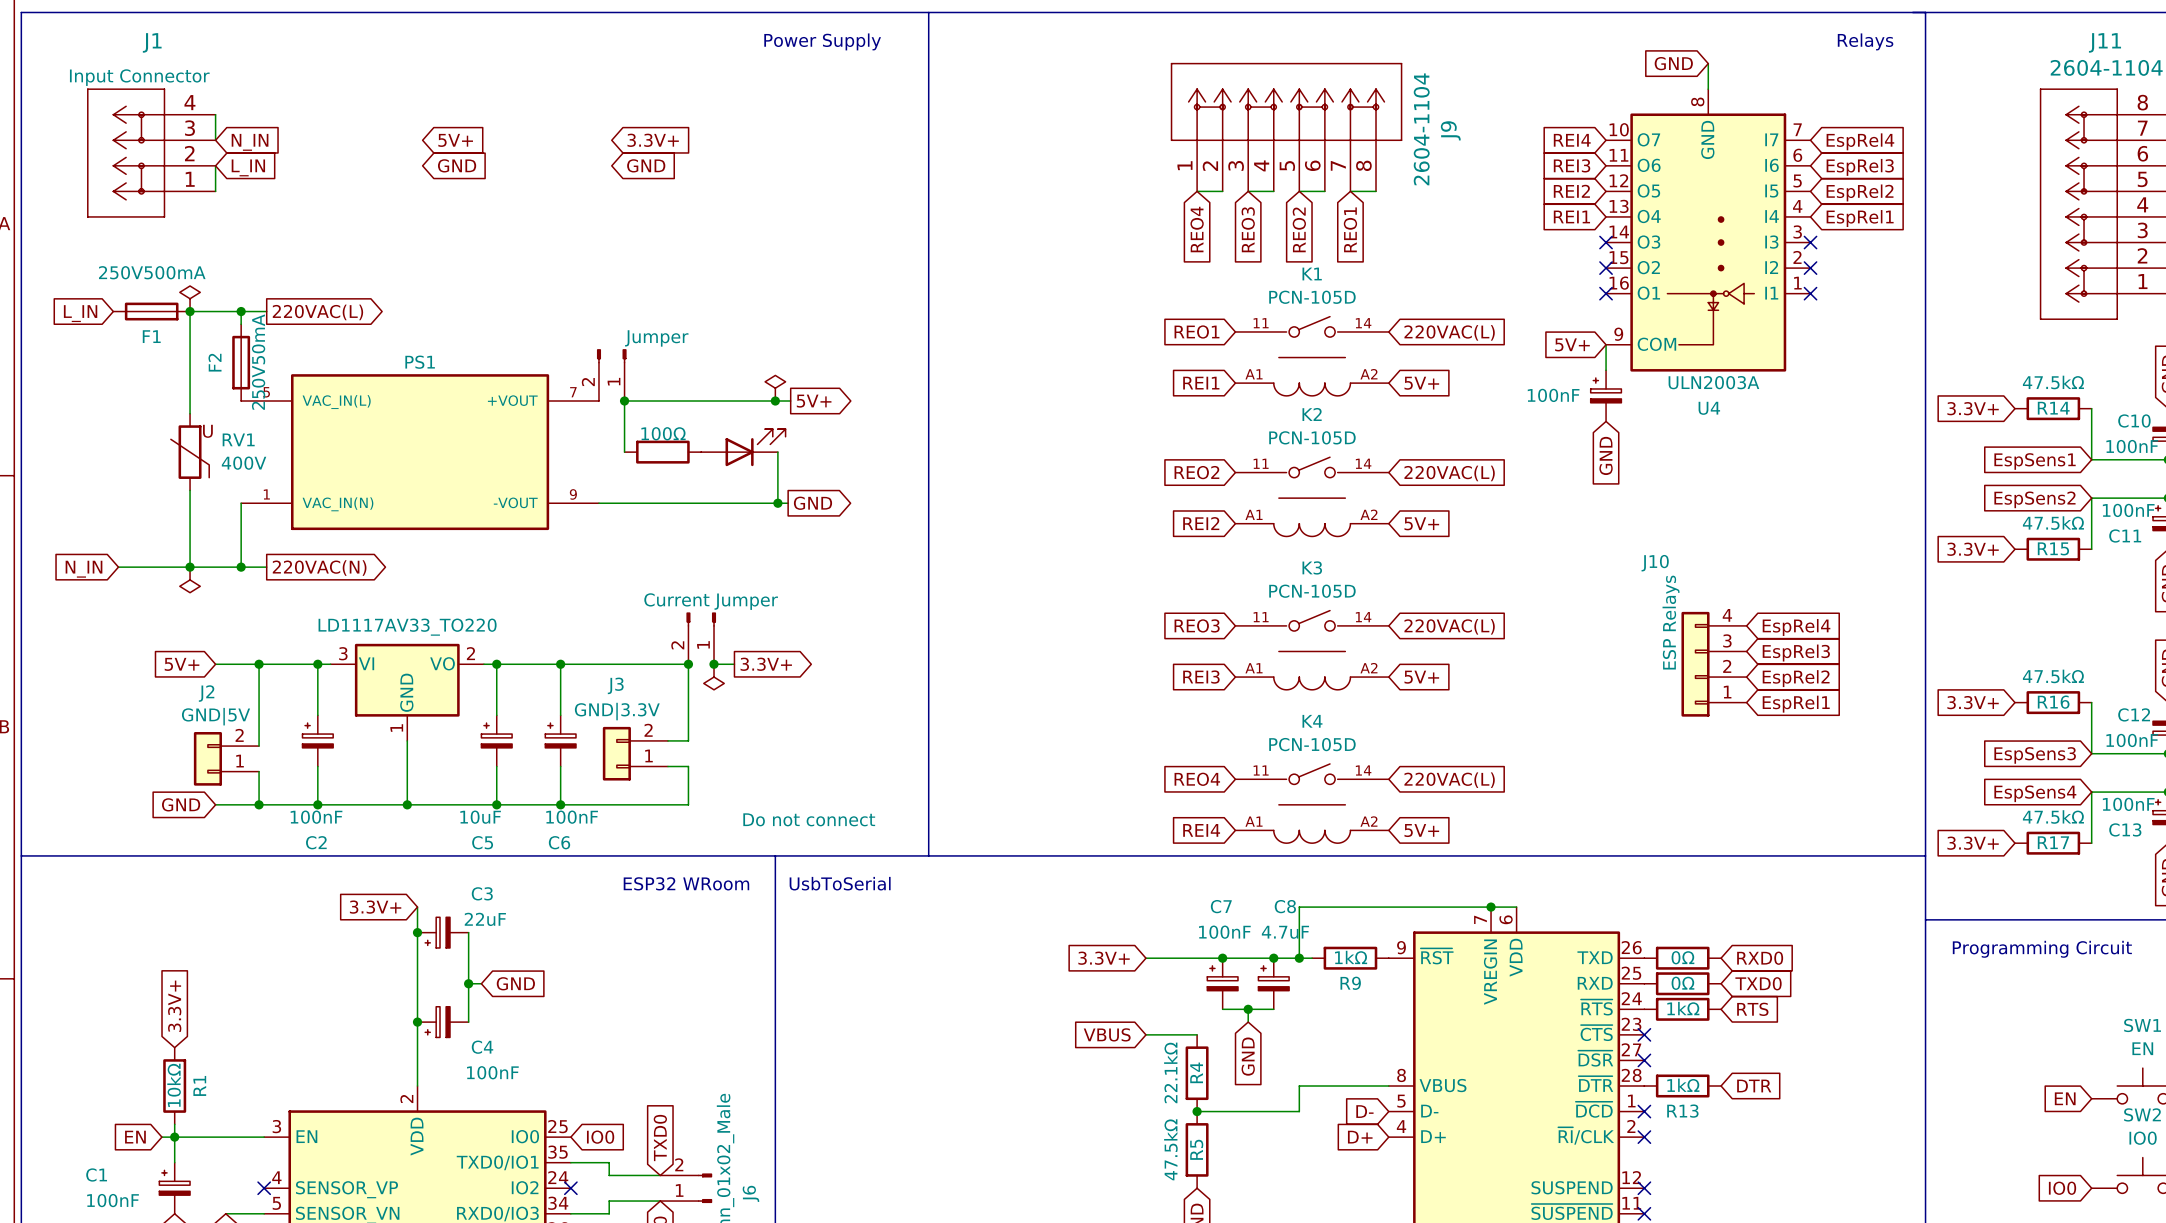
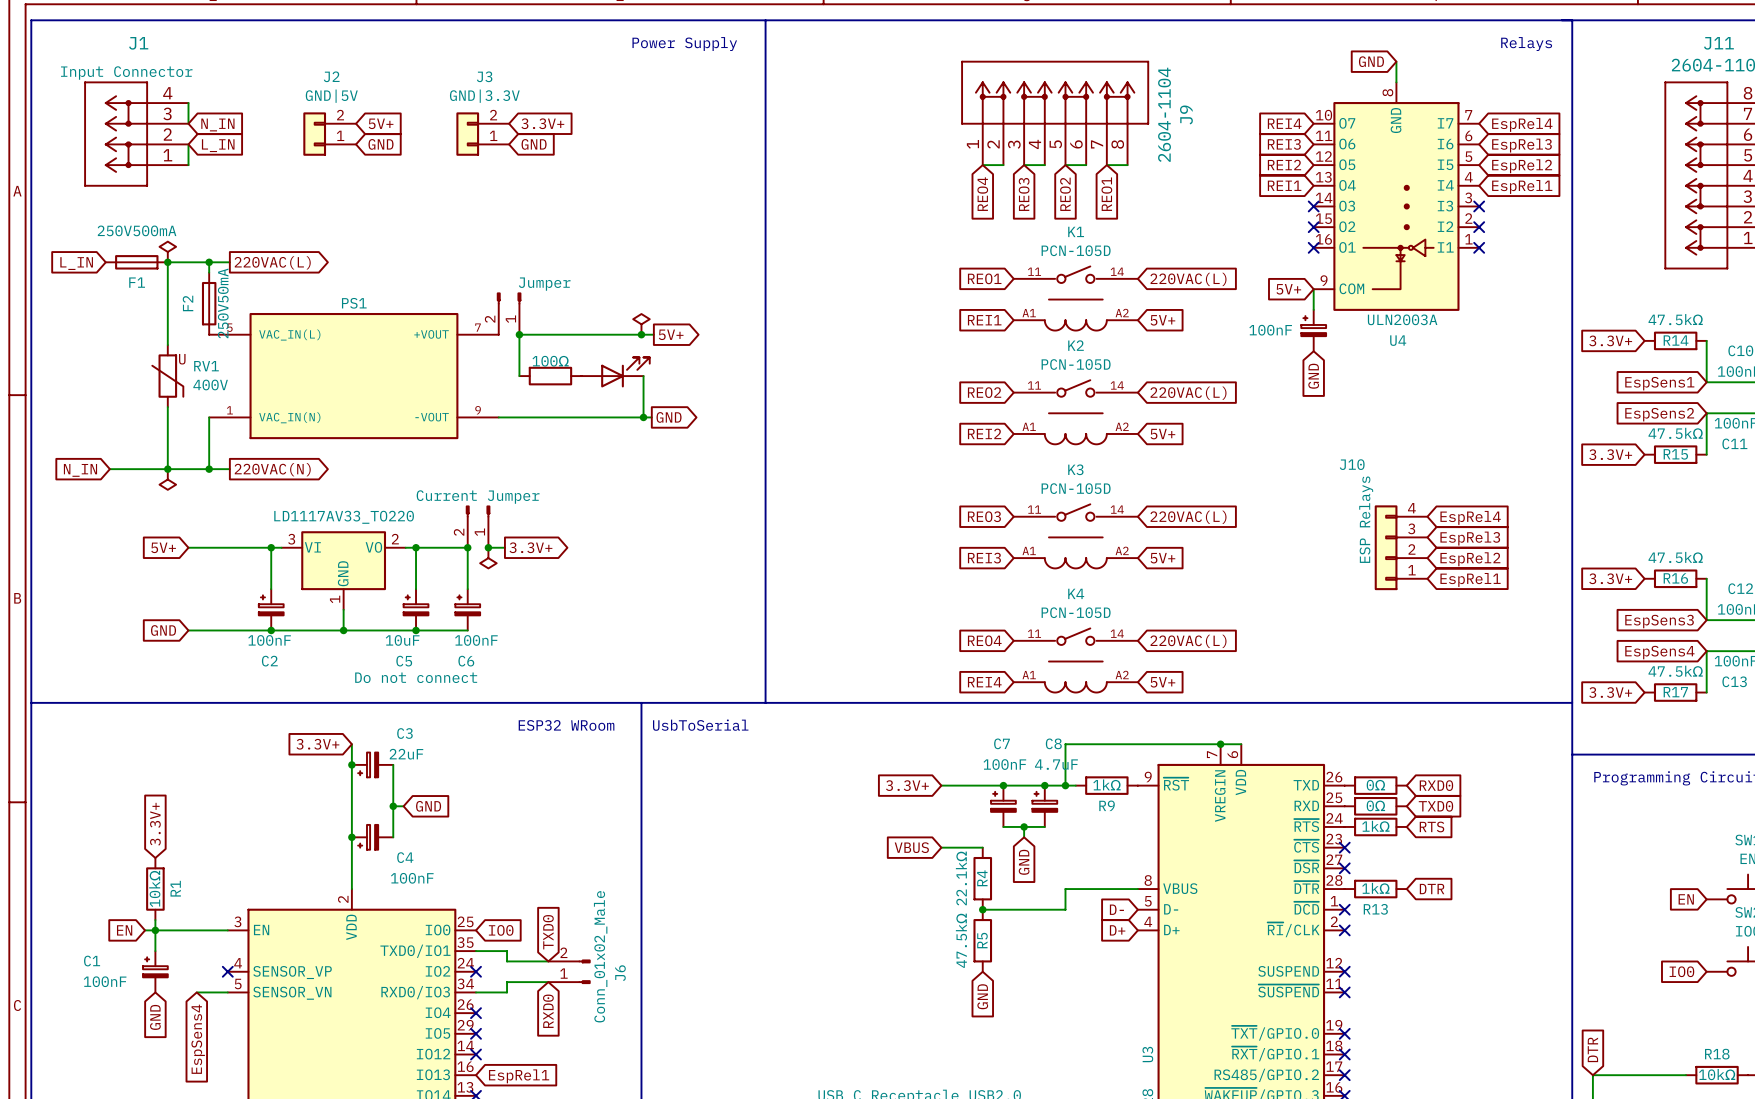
part position: (701, 638) -> (478, 526)
wire: (259, 664) (259, 746) -> none
junction: (259, 664) -> none
wire: (560, 664) (586, 664) -> none
junction: none -> (488, 547)
wire: (606, 664) (688, 664) (688, 740) (668, 740) -> none
junction: (688, 664) -> none
wire: (714, 664) (734, 664) -> none
junction: (714, 664) -> none
global label position: 3.3V+ (766, 664) -> 3.3V+ (530, 547)
power symbol position: (714, 677) -> (488, 558)
J3 name position: J3 (615, 685) -> J3 (484, 76)
J2 name position: J2 (206, 693) -> J2 (331, 76)
J3 value position: GND|3.3V (617, 711) -> GND|3.3V (484, 96)
J2 value position: GND|5V (216, 716) -> GND|5V (331, 96)
J3 position: (635, 753) -> (482, 134)
J2 position: (226, 758) -> (329, 134)
wire: (317, 766) (317, 804) -> none
junction: none -> (271, 630)
wire: (407, 766) (407, 804) -> none
wire: (496, 766) (496, 804) -> none
junction: none -> (416, 630)
wire: (560, 766) (560, 804) -> (467, 630) (188, 630)
wire: (668, 766) (688, 766) (688, 804) (215, 804) -> none
wire: (259, 771) (259, 804) -> none
global label position: GND (181, 804) -> GND (163, 630)
junction: (259, 804) -> none
junction: (317, 804) -> none
junction position: (407, 804) -> (343, 630)
junction: (496, 804) -> none
junction: (560, 804) -> none
C2 value position: 100nF (316, 817) -> 100nF (269, 640)
C5 value position: 10uF (480, 817) -> 10uF (402, 640)
C6 value position: 100nF (572, 817) -> 100nF (476, 640)
C5 text position: Do not connect (809, 819) -> Do not connect (416, 677)
C2 name position: C2 (316, 842) -> C2 (269, 661)
C5 name position: C5 (482, 842) -> C5 (404, 661)
C6 name position: C6 (559, 842) -> C6 (466, 661)

